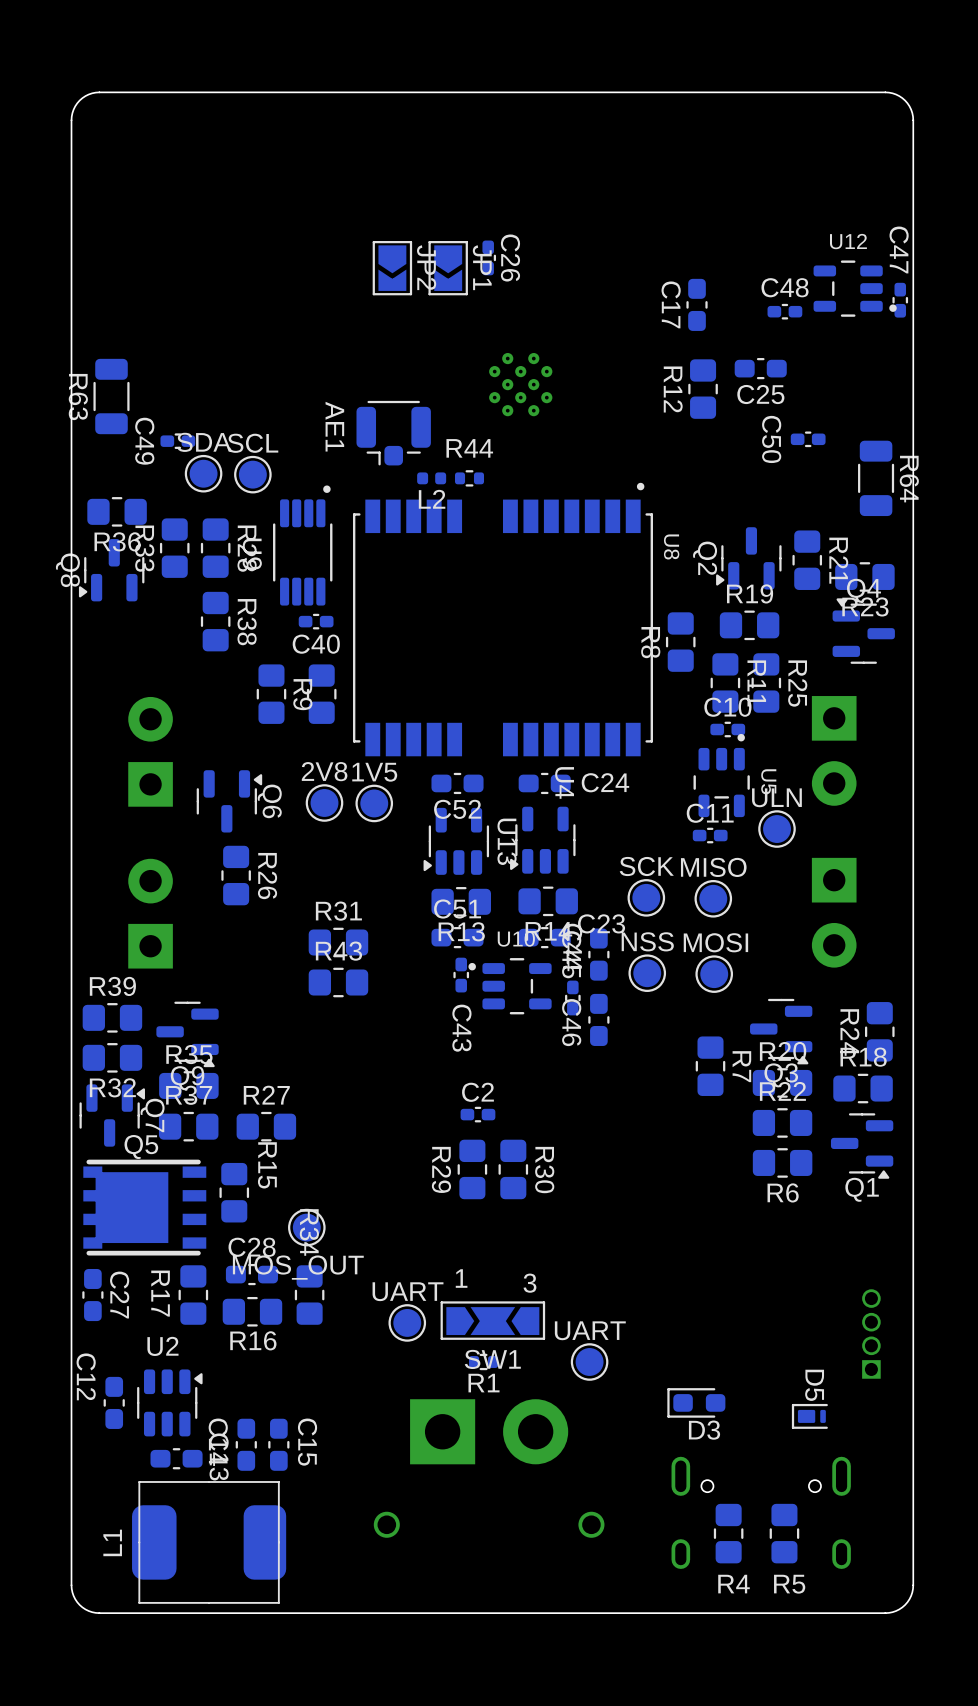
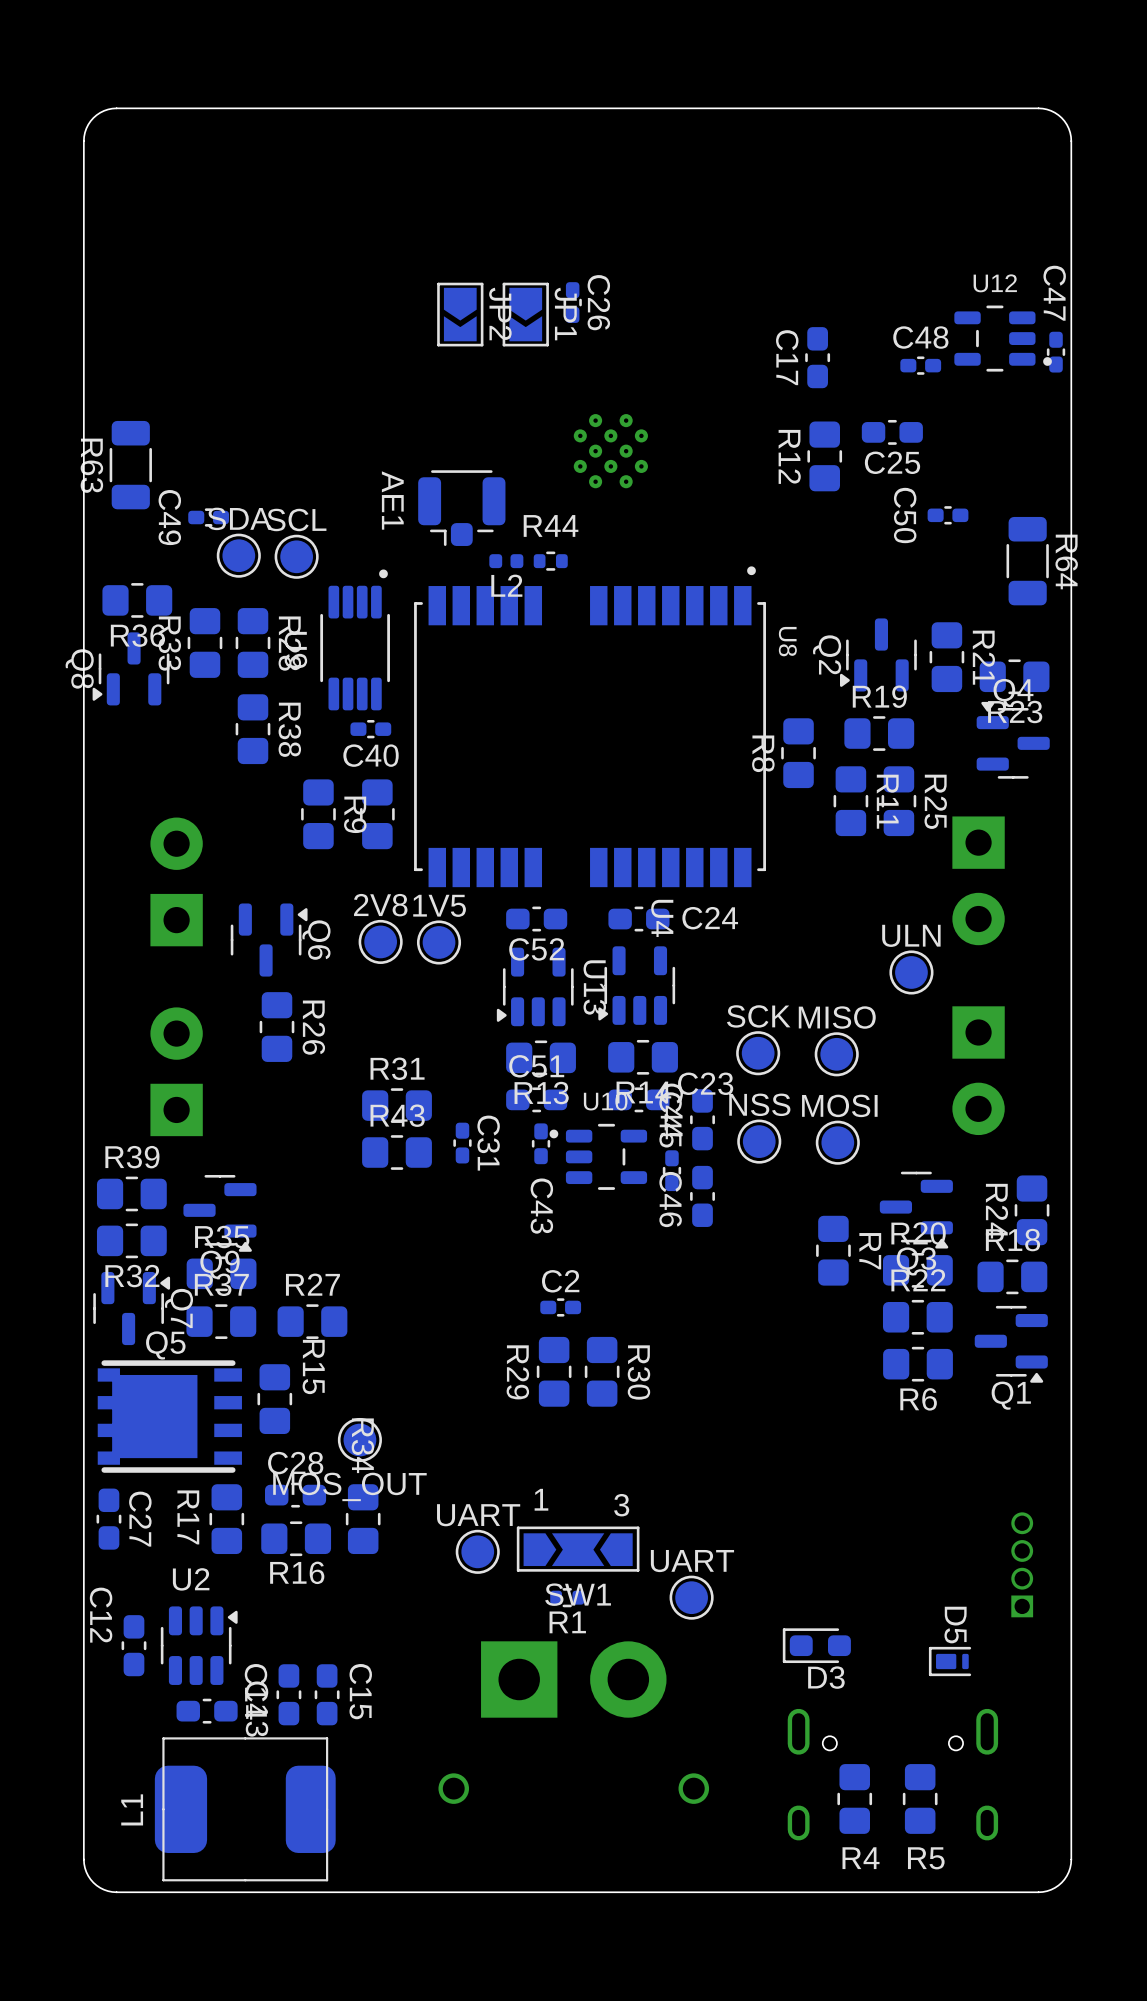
C10: (727, 729) -> none
U5: (721, 775) -> none
C11: (710, 835) -> none
C31: none -> (462, 1143)

